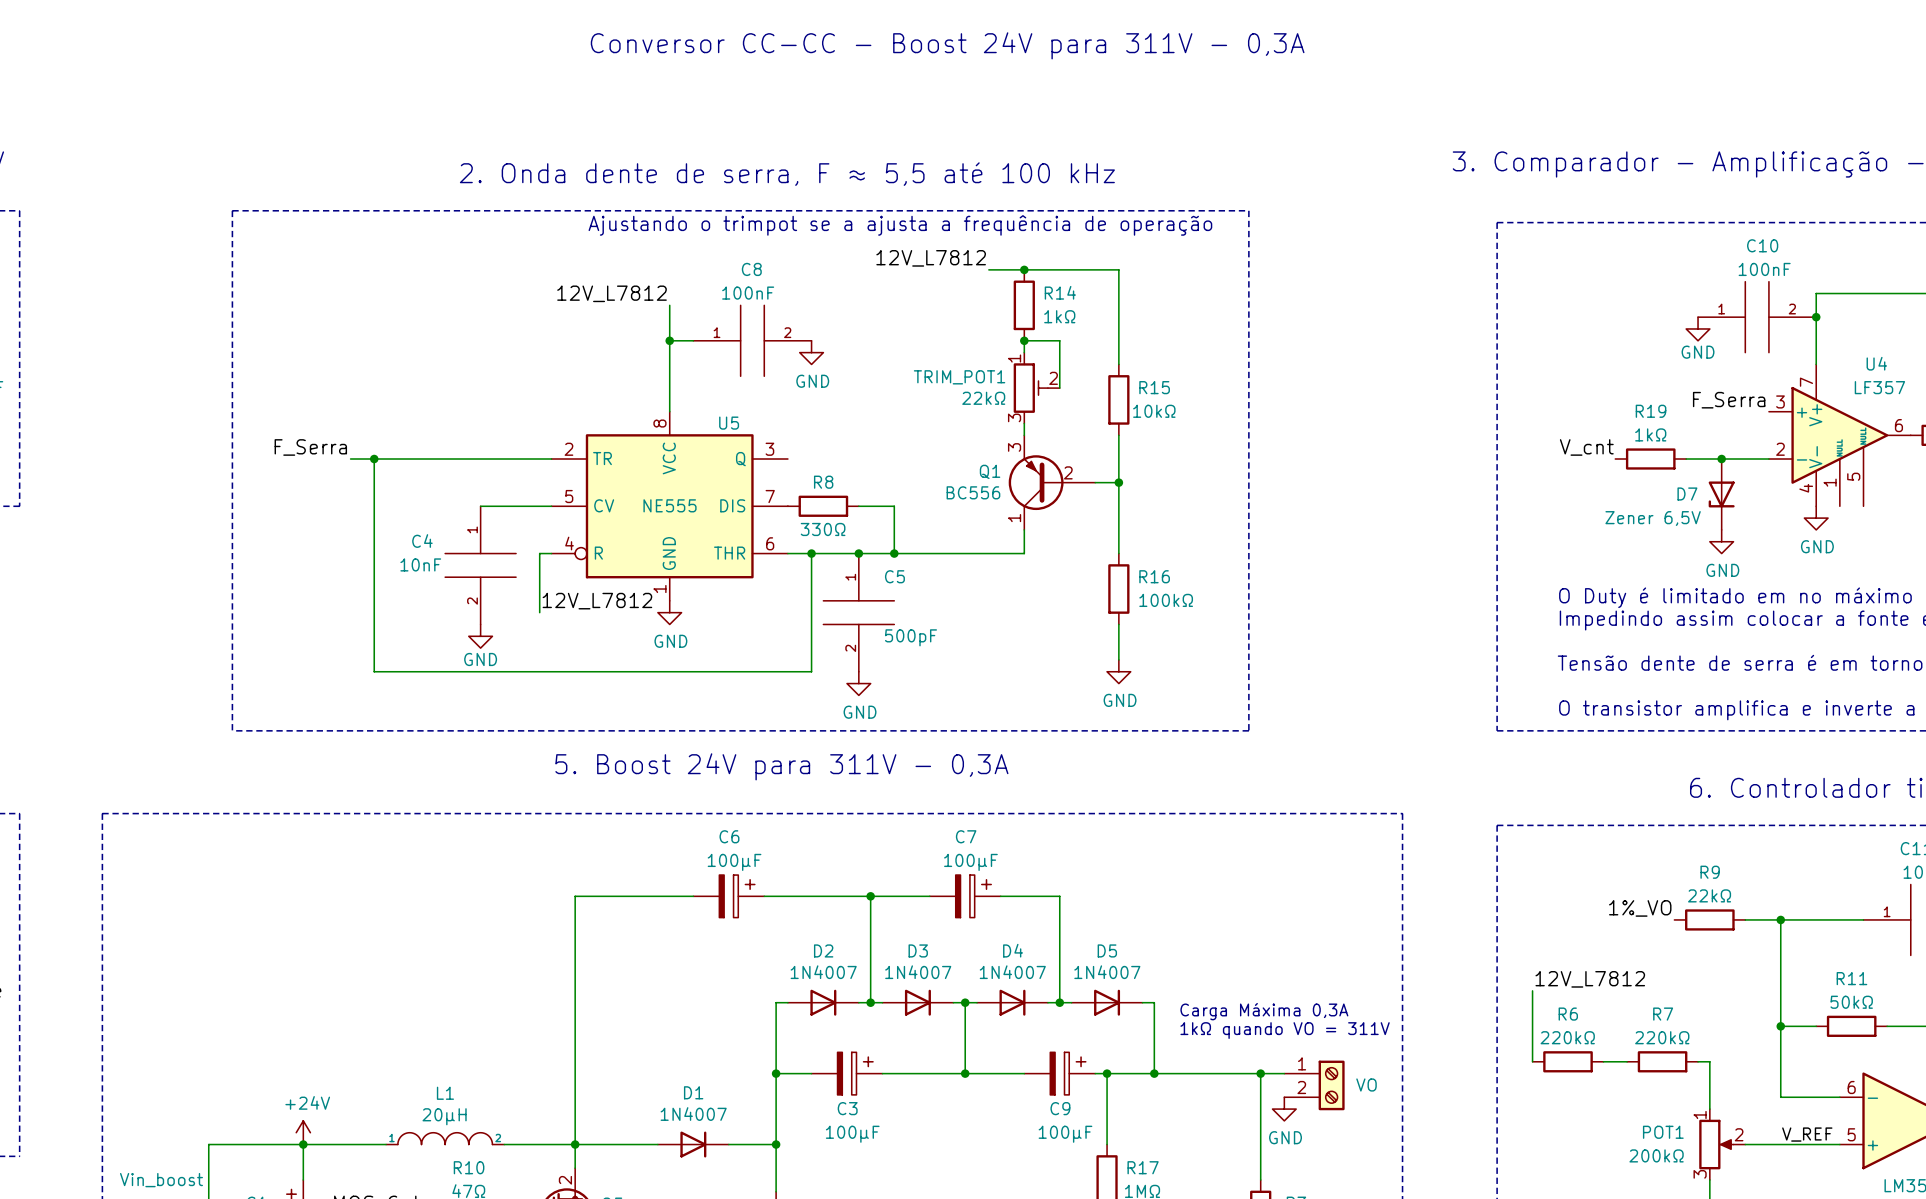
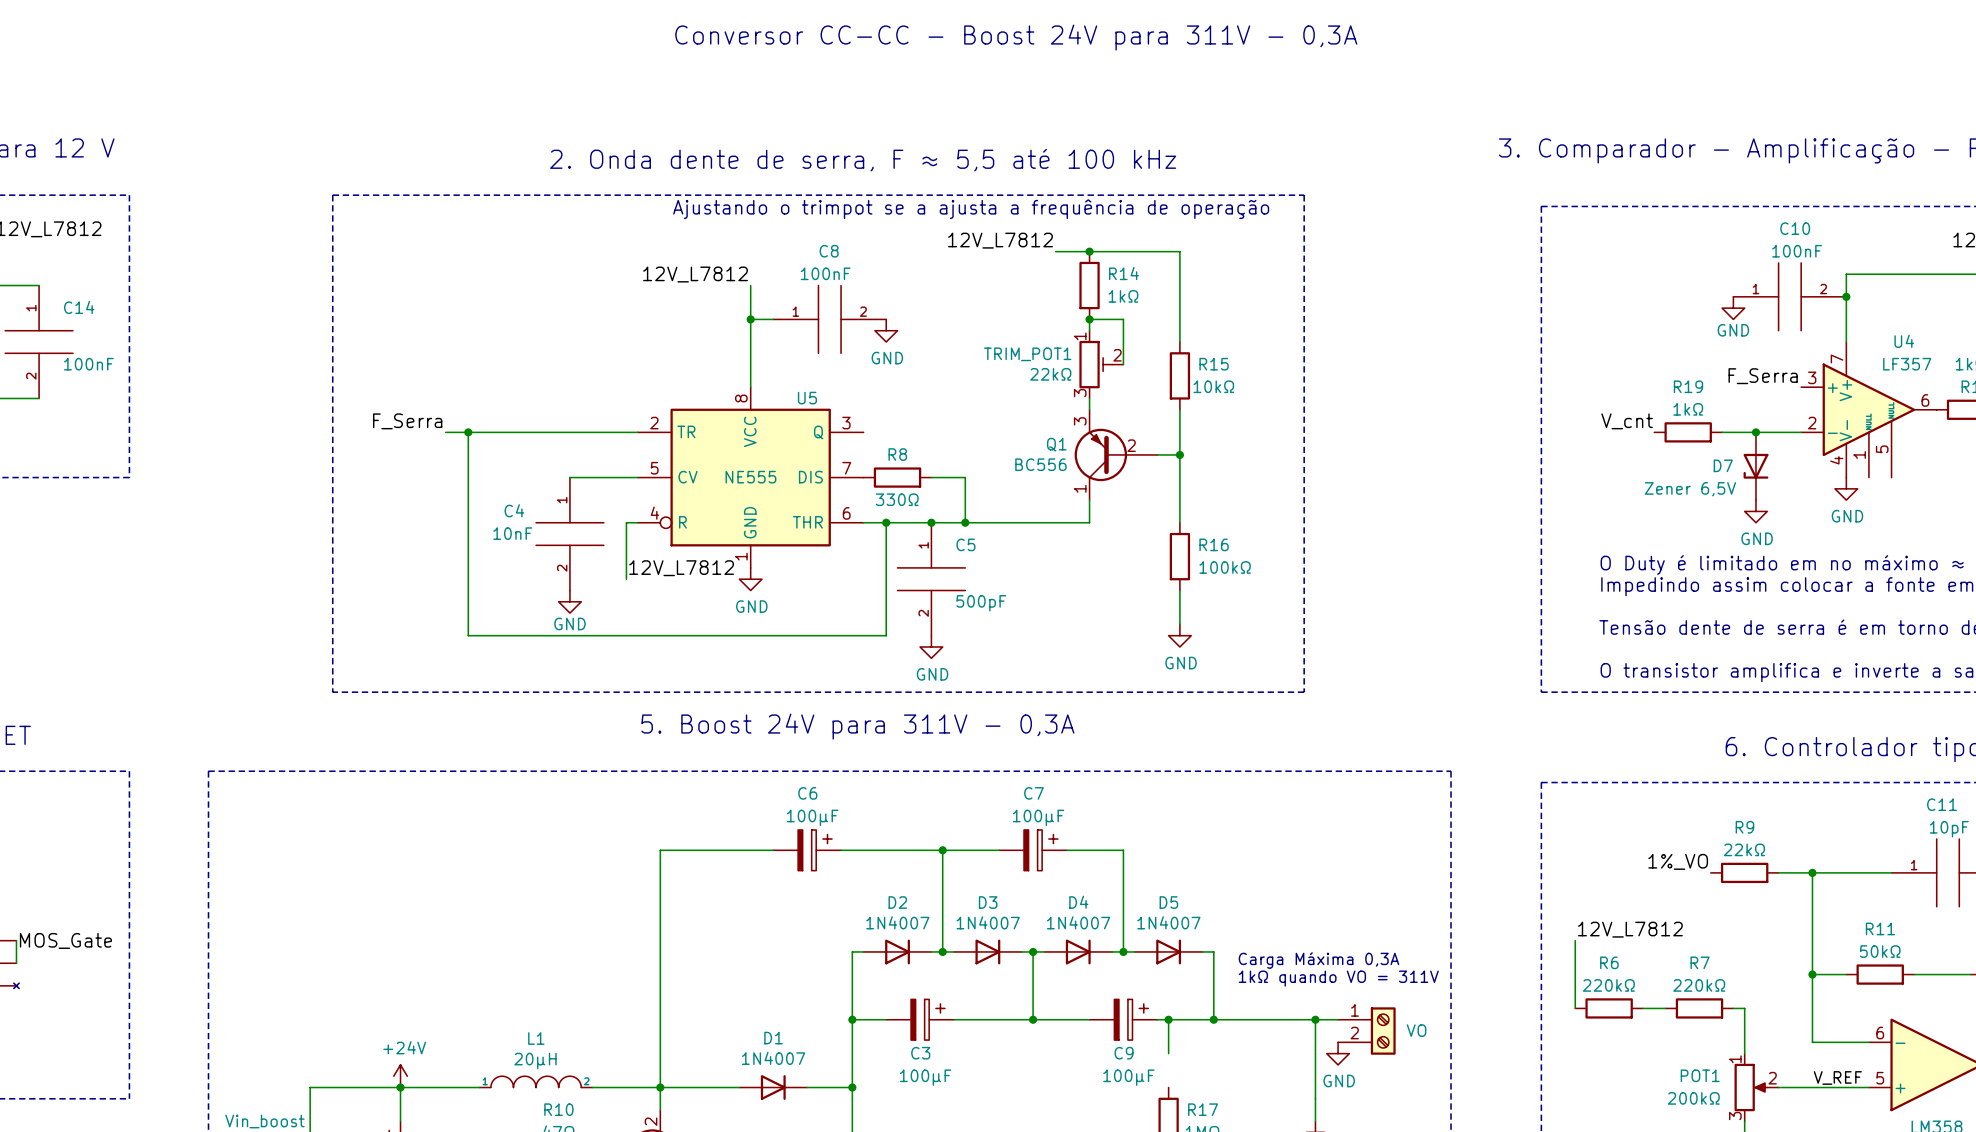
wire: (1107, 1109) (1107, 1144) -> none

